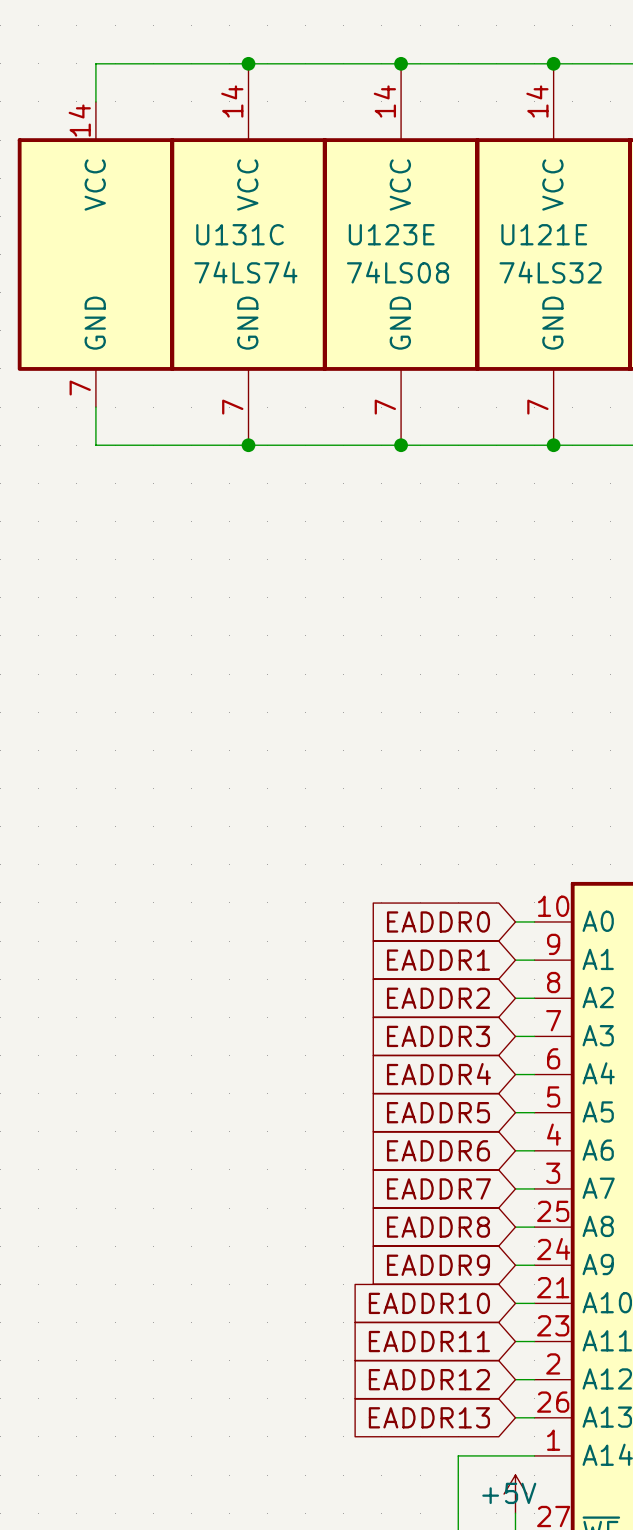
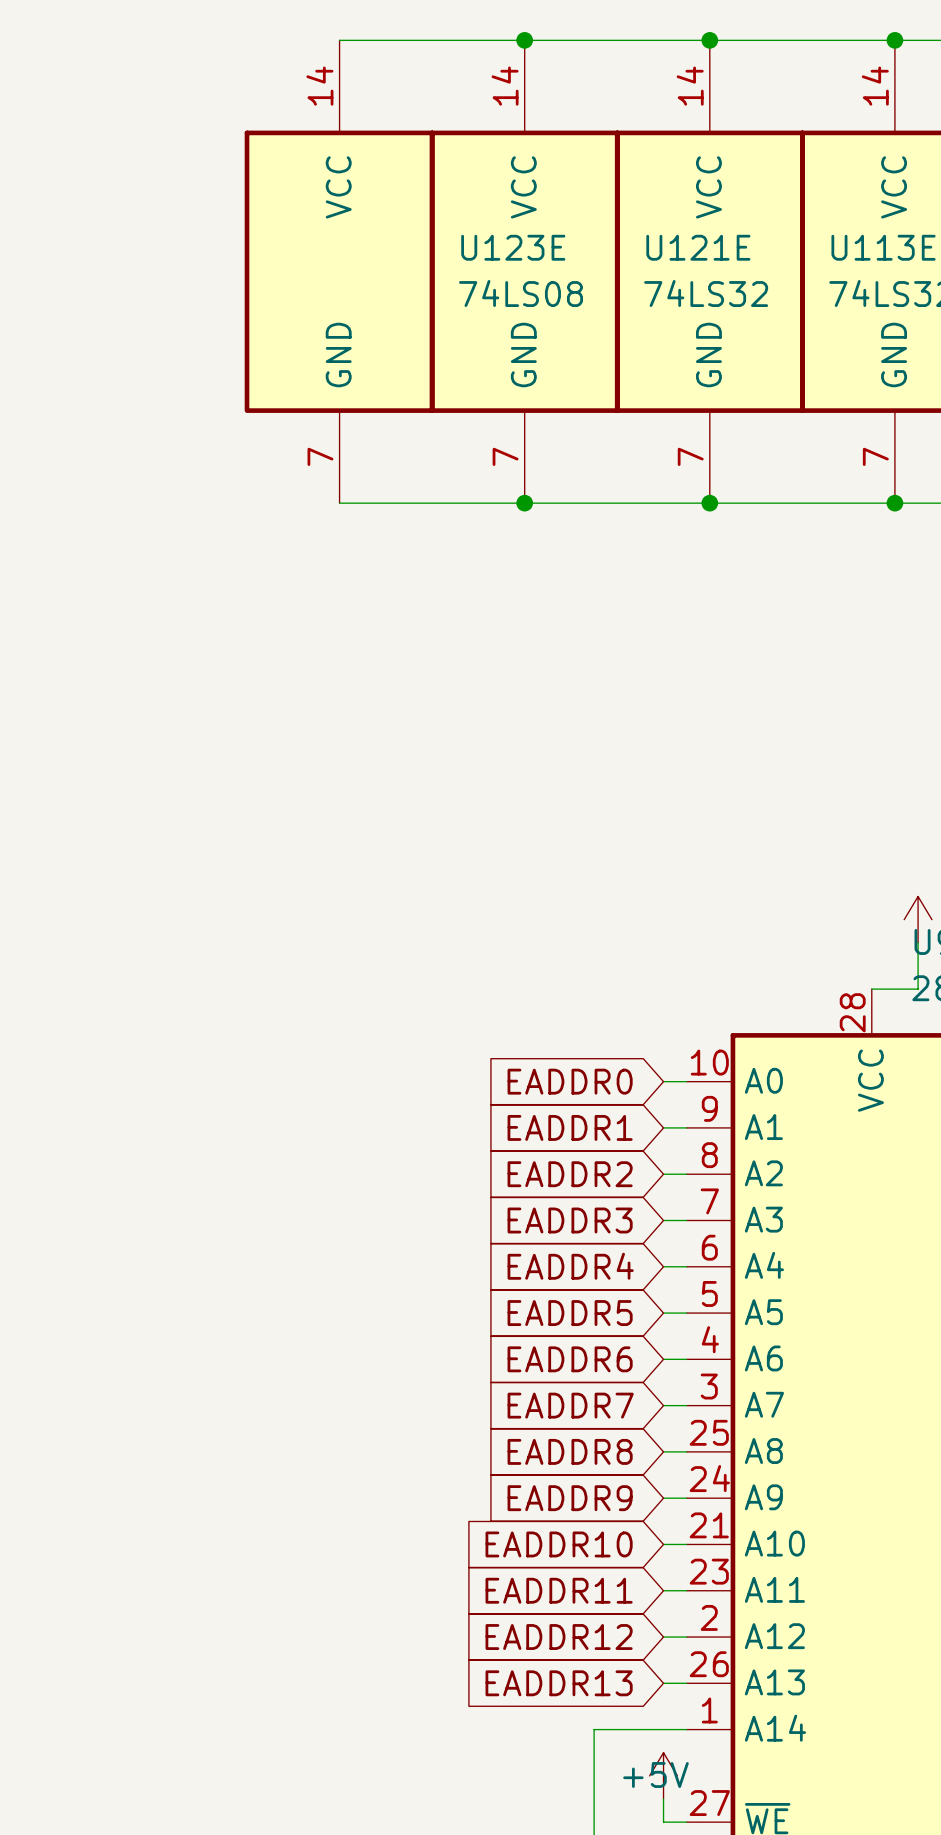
wire: (248, 63) (95, 63) (95, 101) -> none
junction: (248, 63) -> none
U131C: 74LS74 (95, 254) -> none
wire: (95, 407) (95, 445) (248, 445) -> none
junction: (248, 445) -> none

